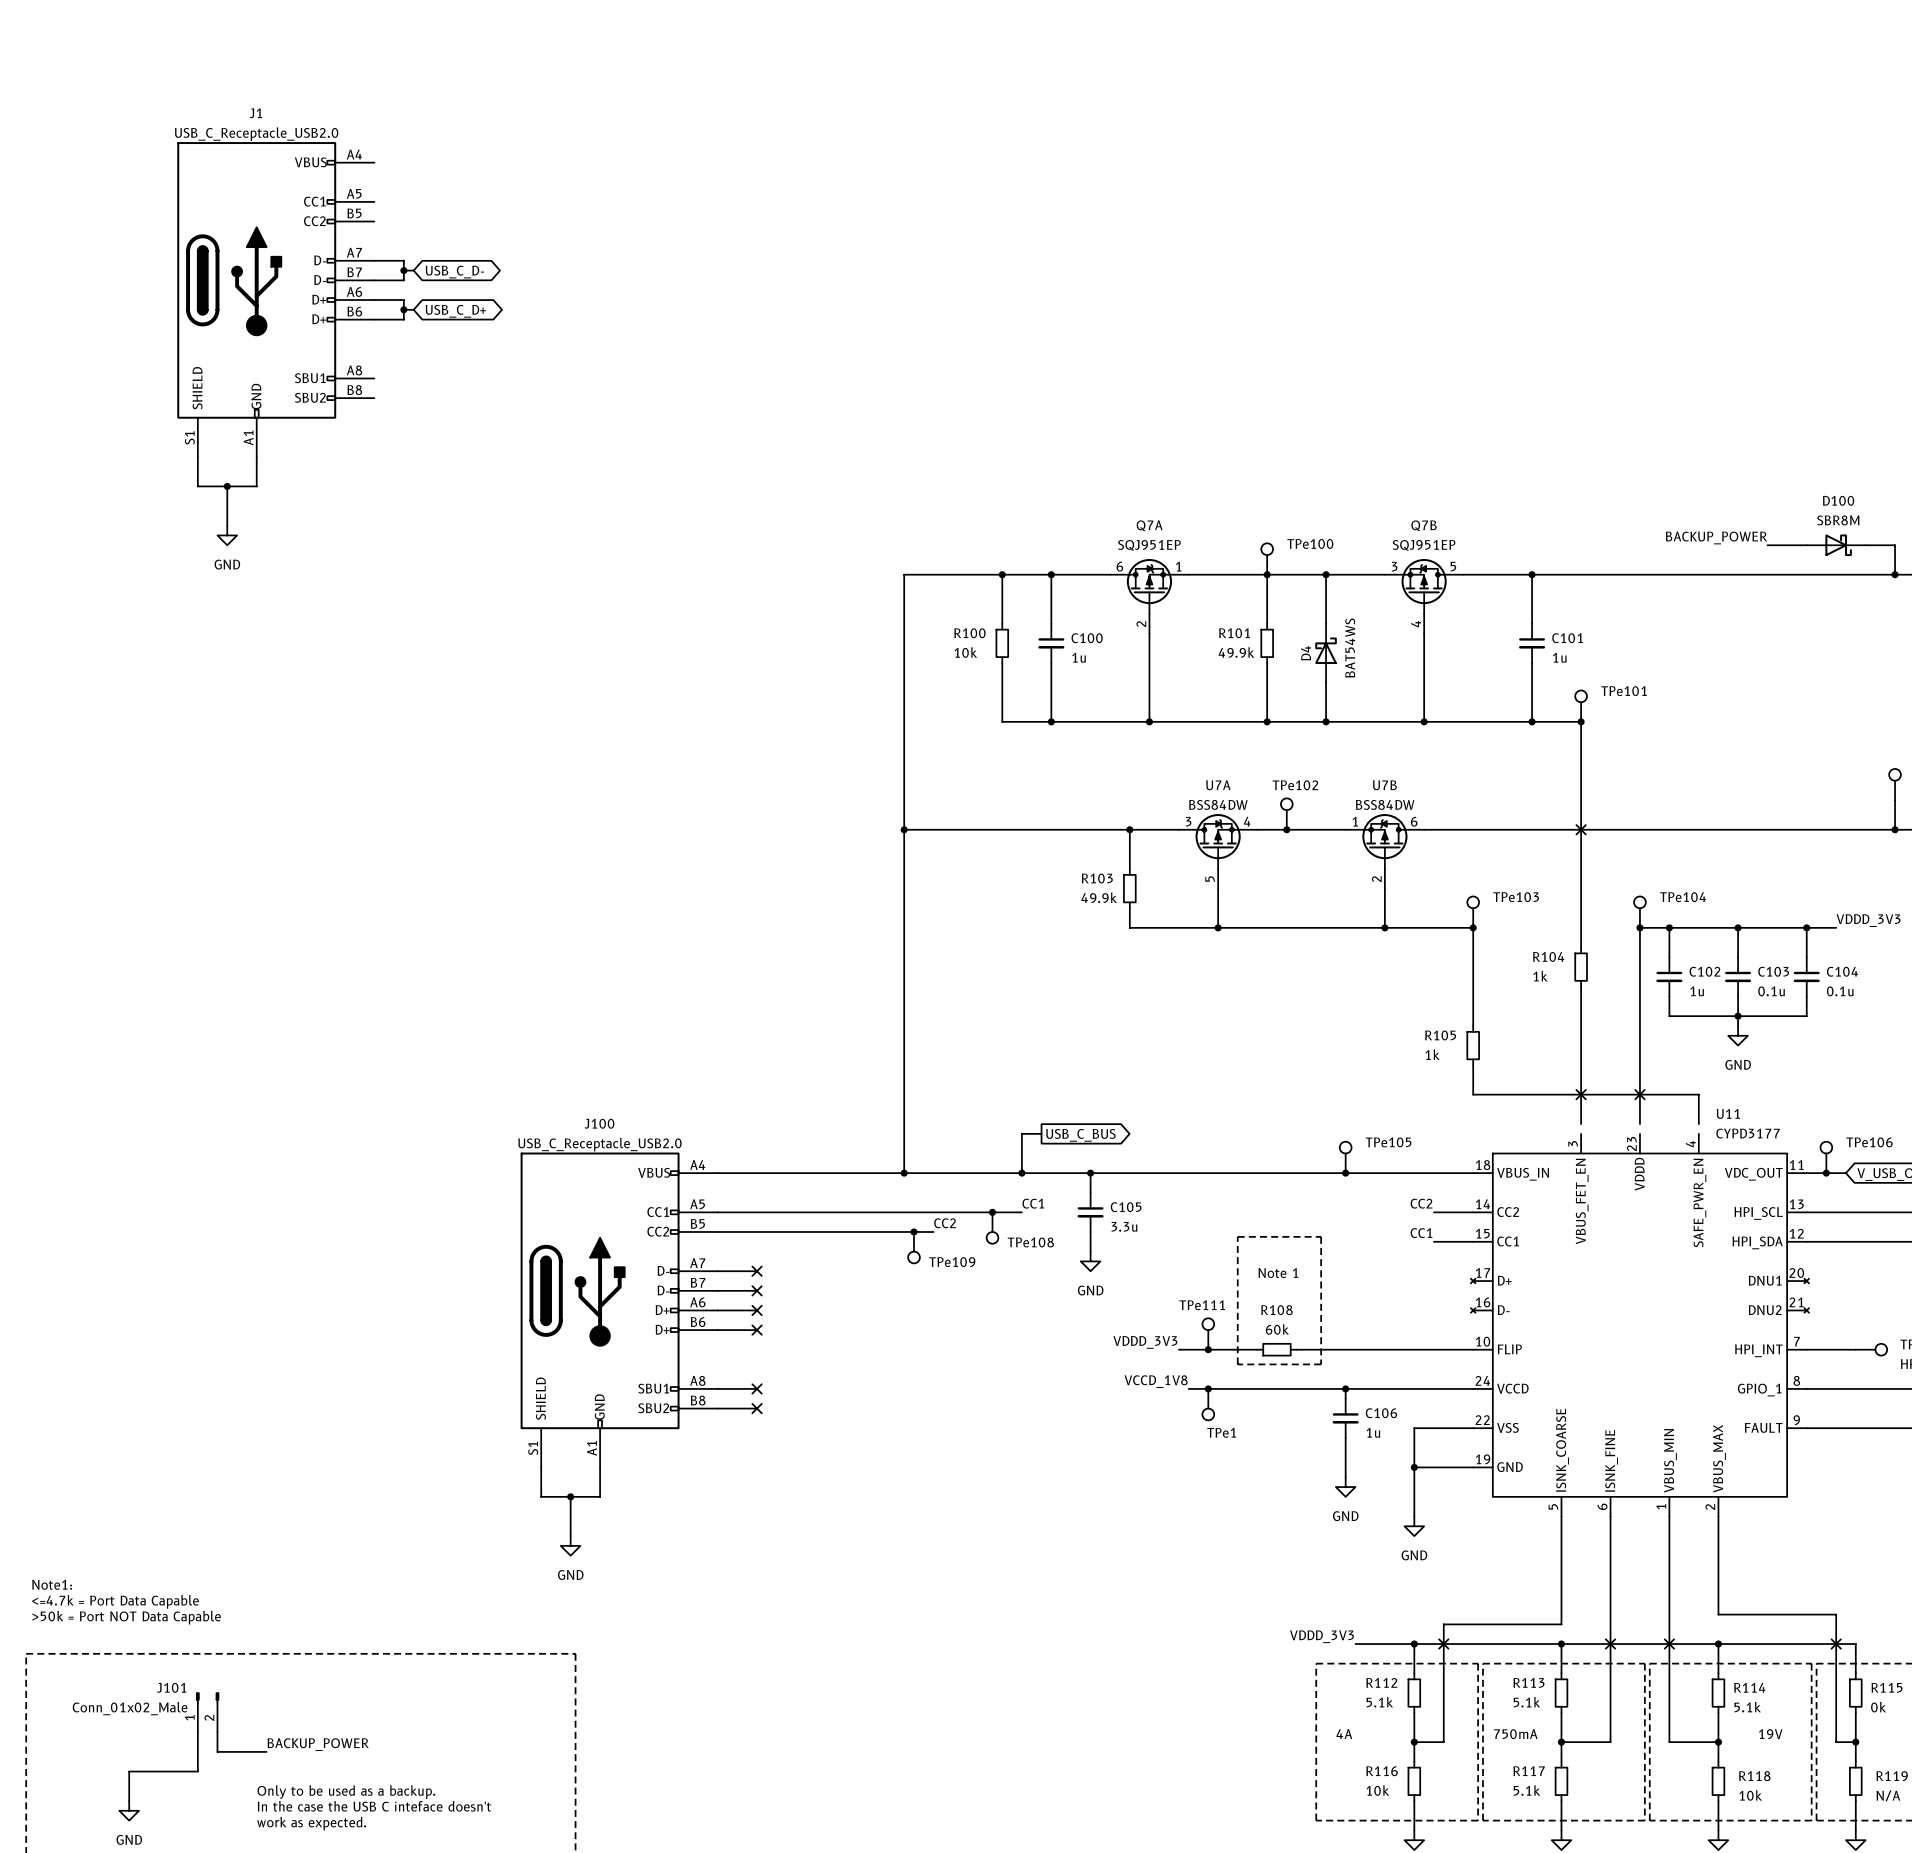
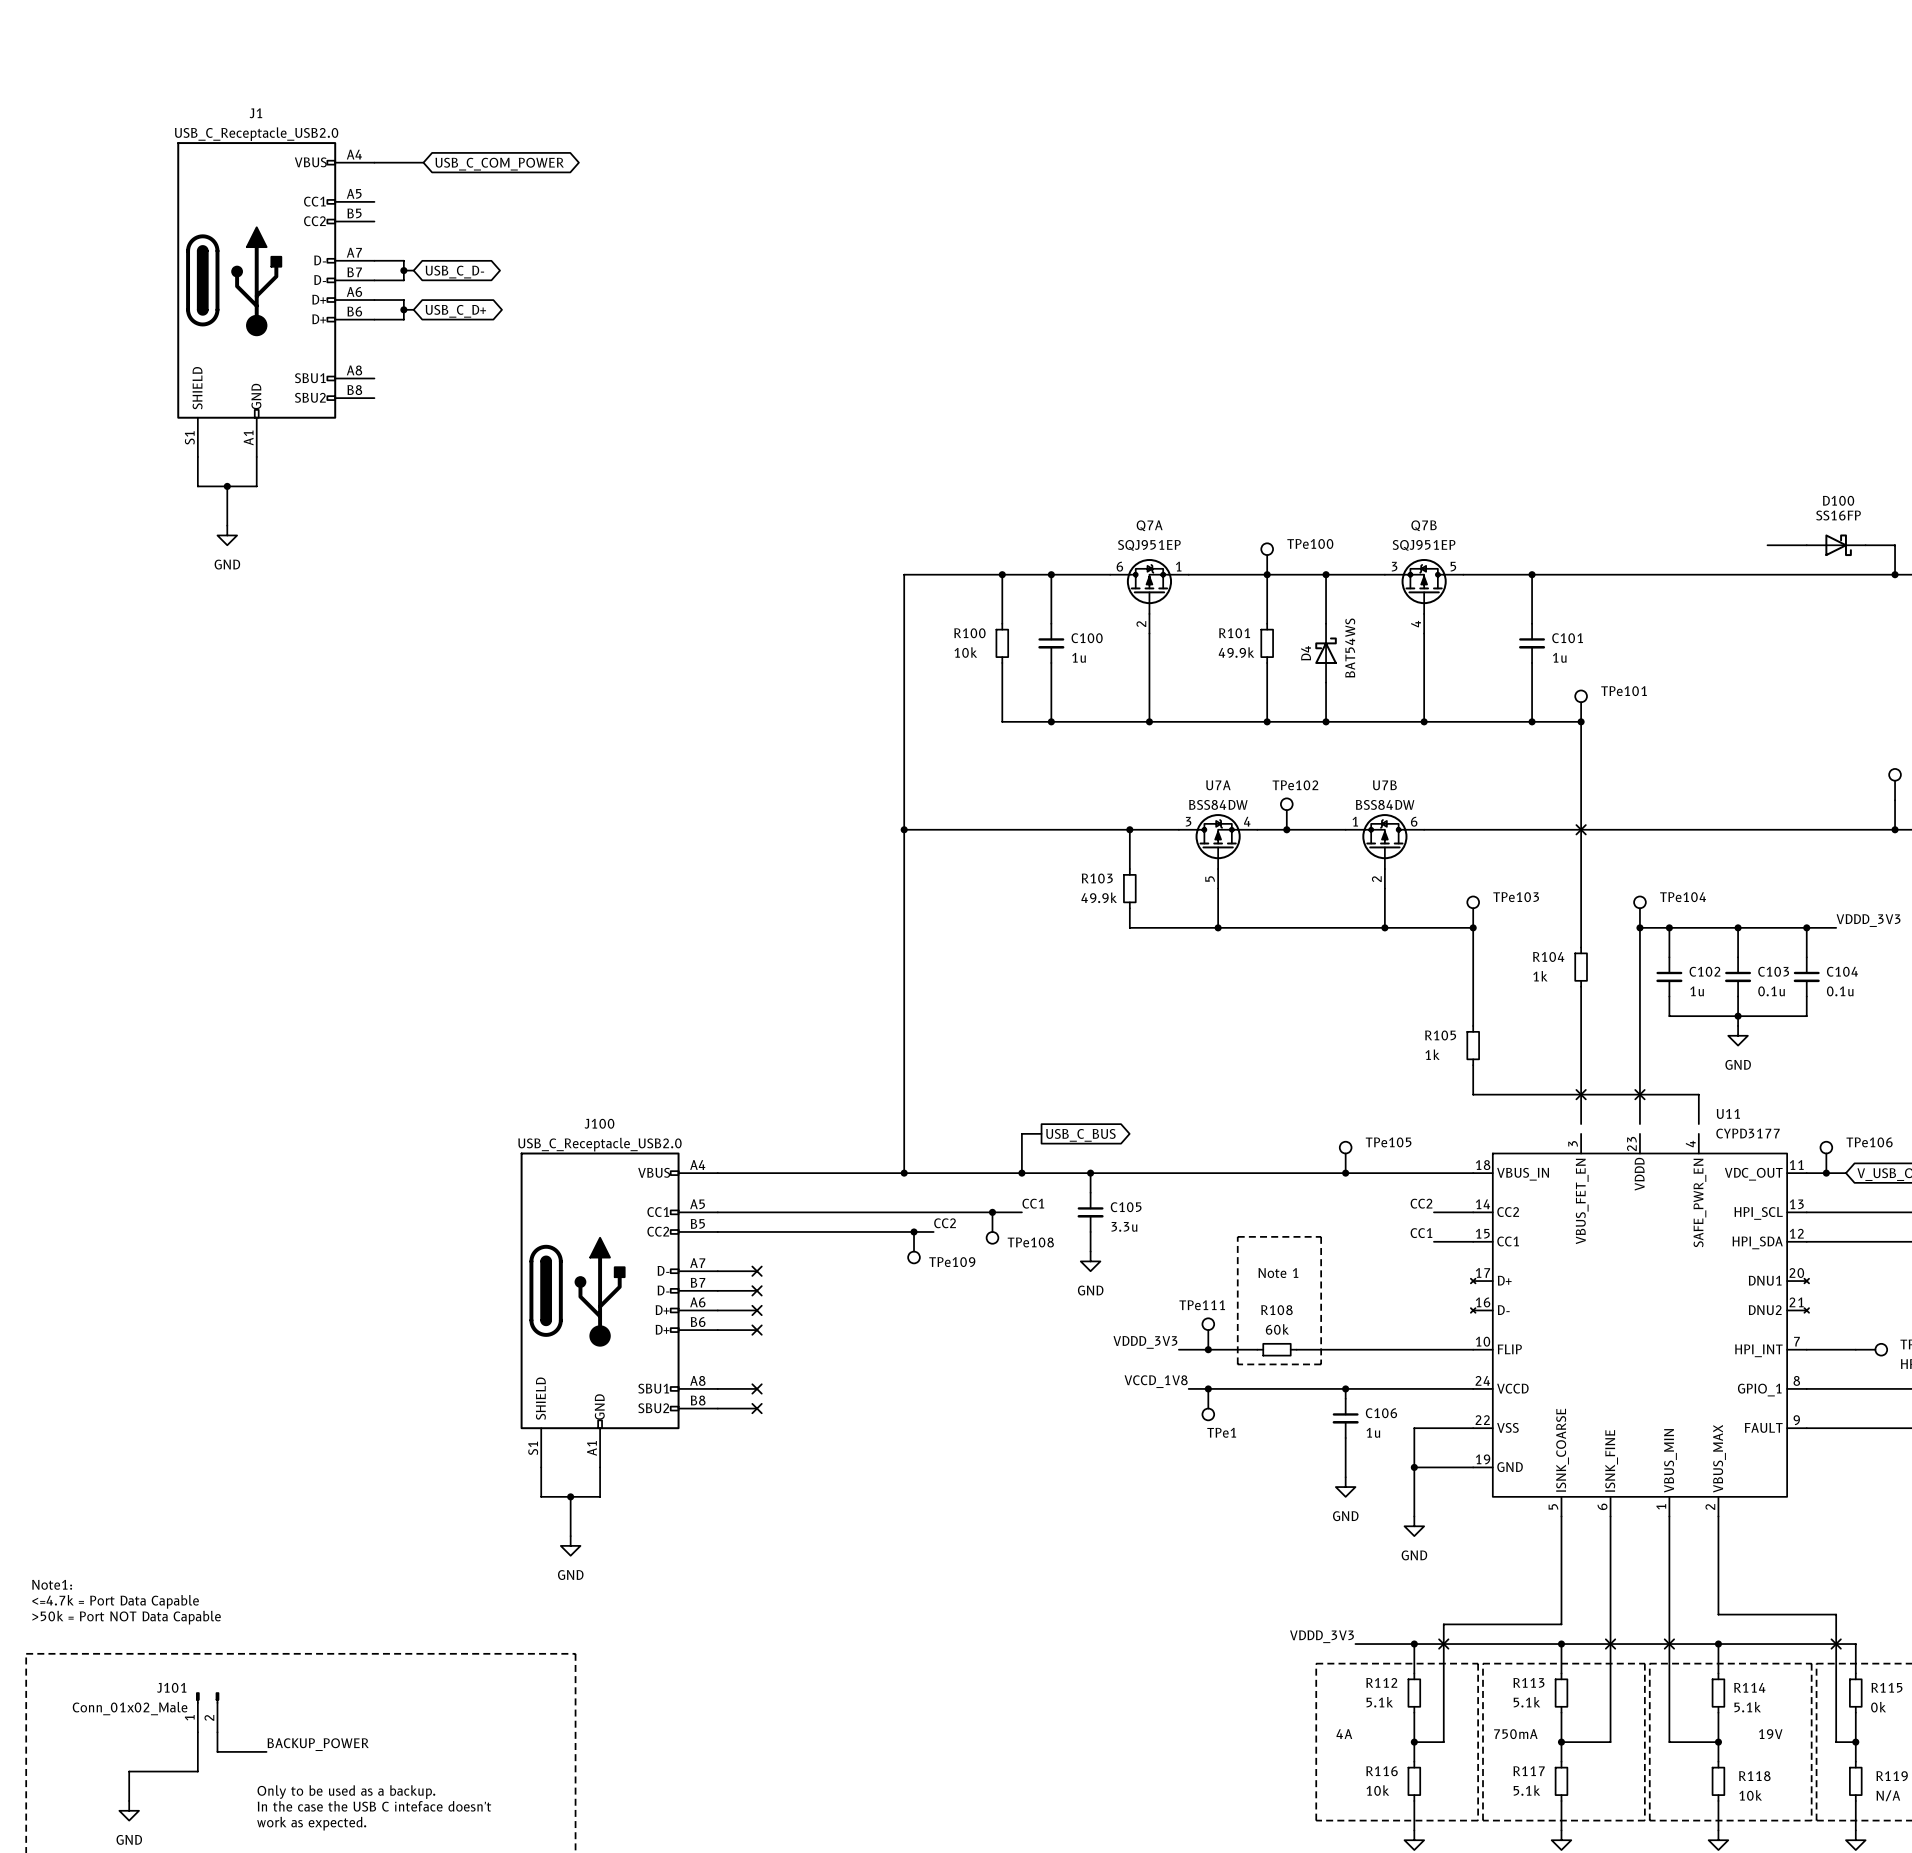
wire: none -> (374, 162) (423, 162)
global label: none -> USB_C_COM_POWER (499, 164)
D100 value: SBR8M (1838, 520) -> SS16FP (1838, 515)
label: BACKUP_POWER (1716, 537) -> none

